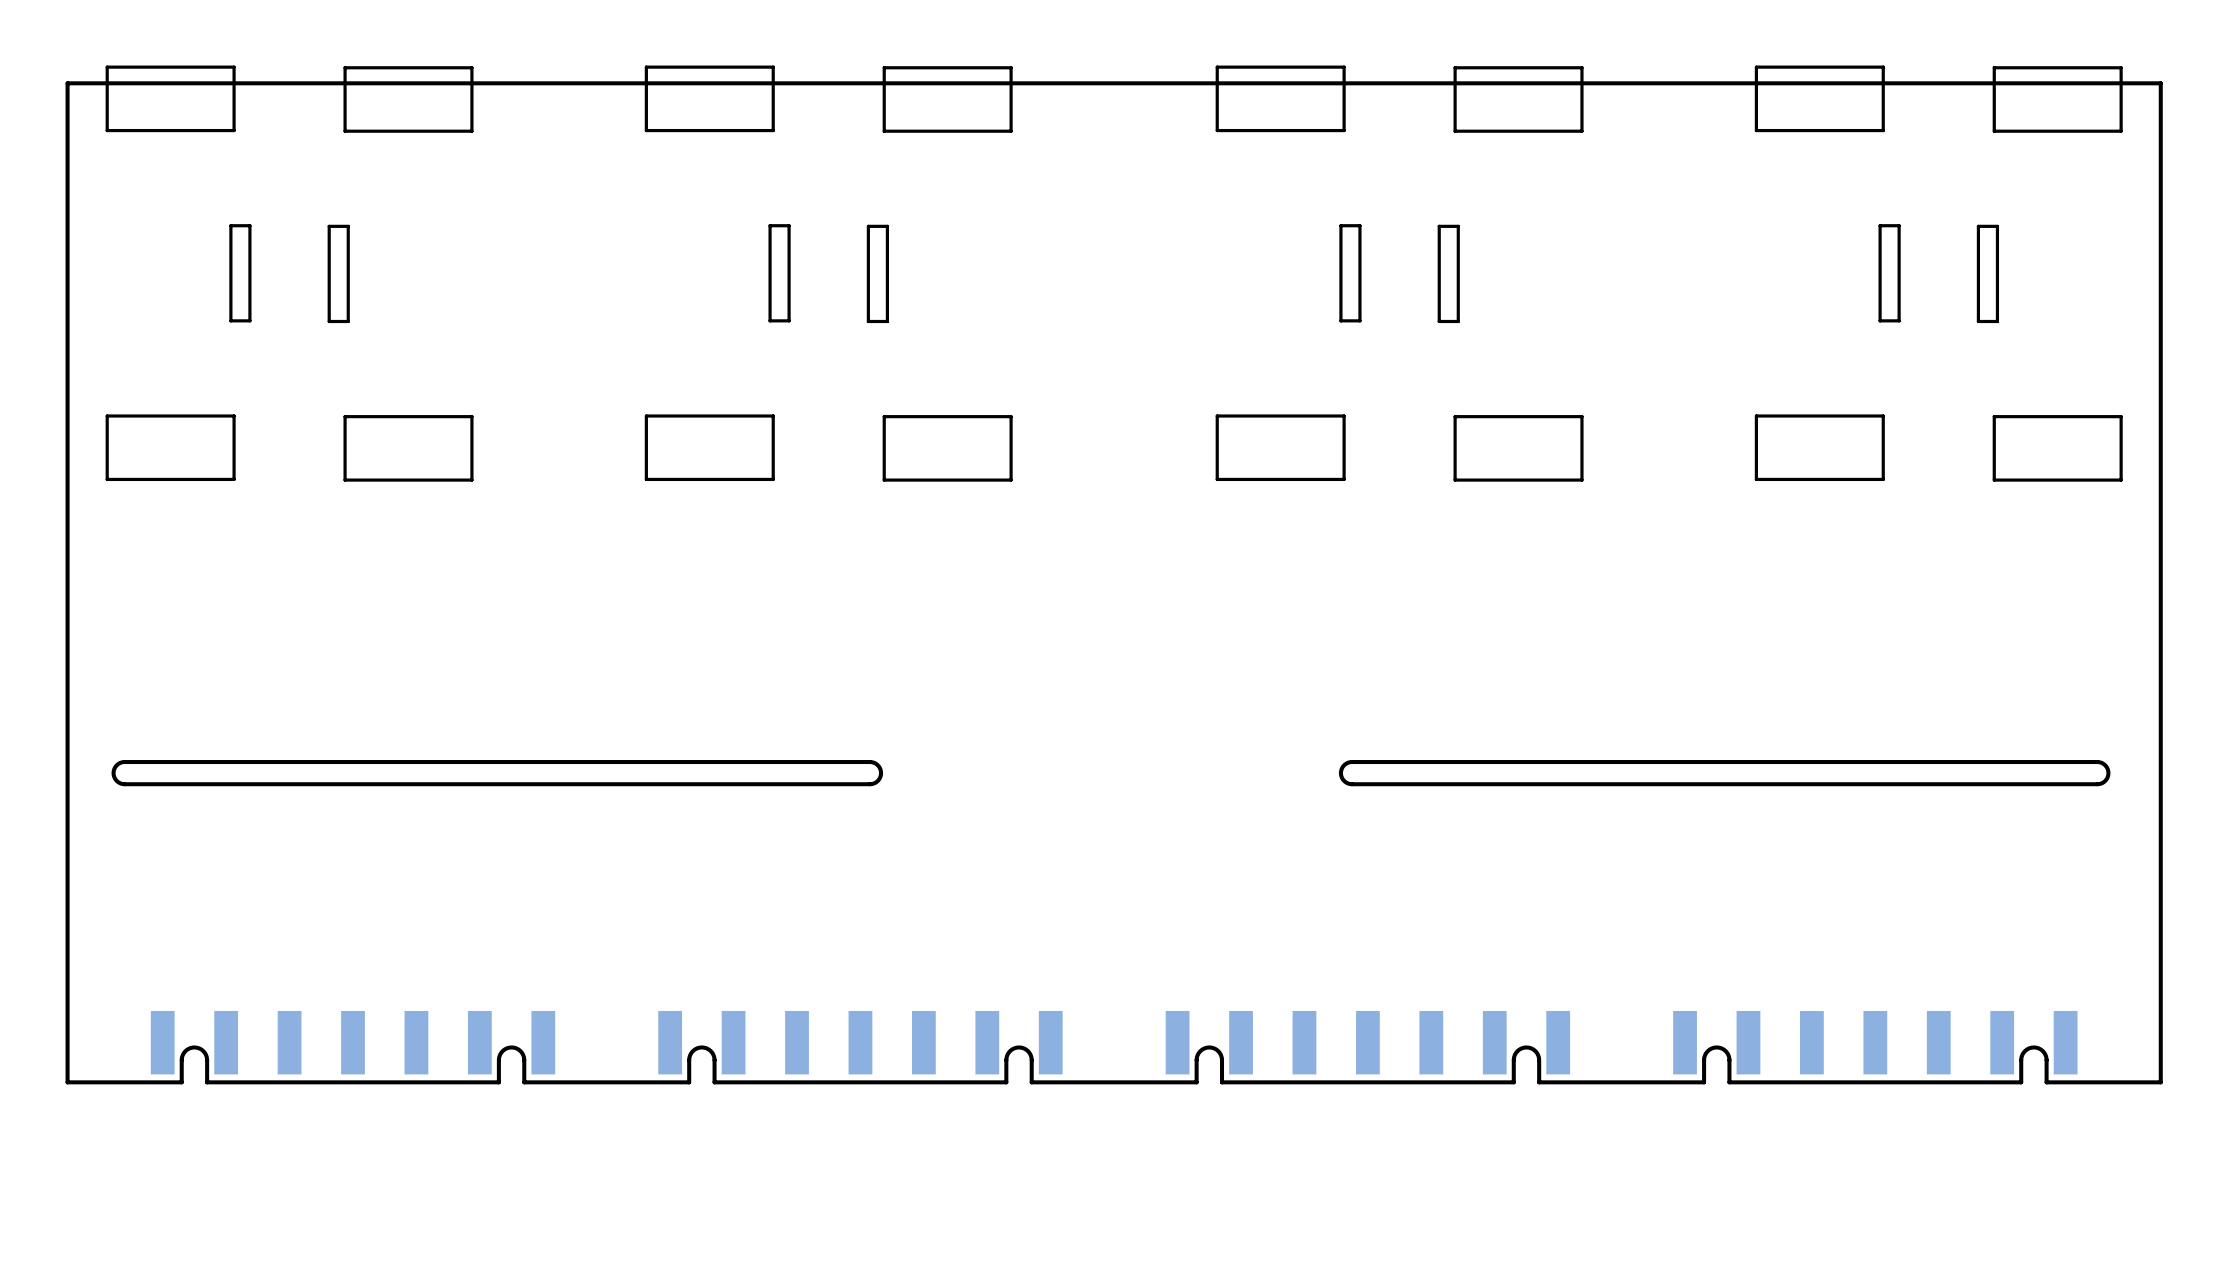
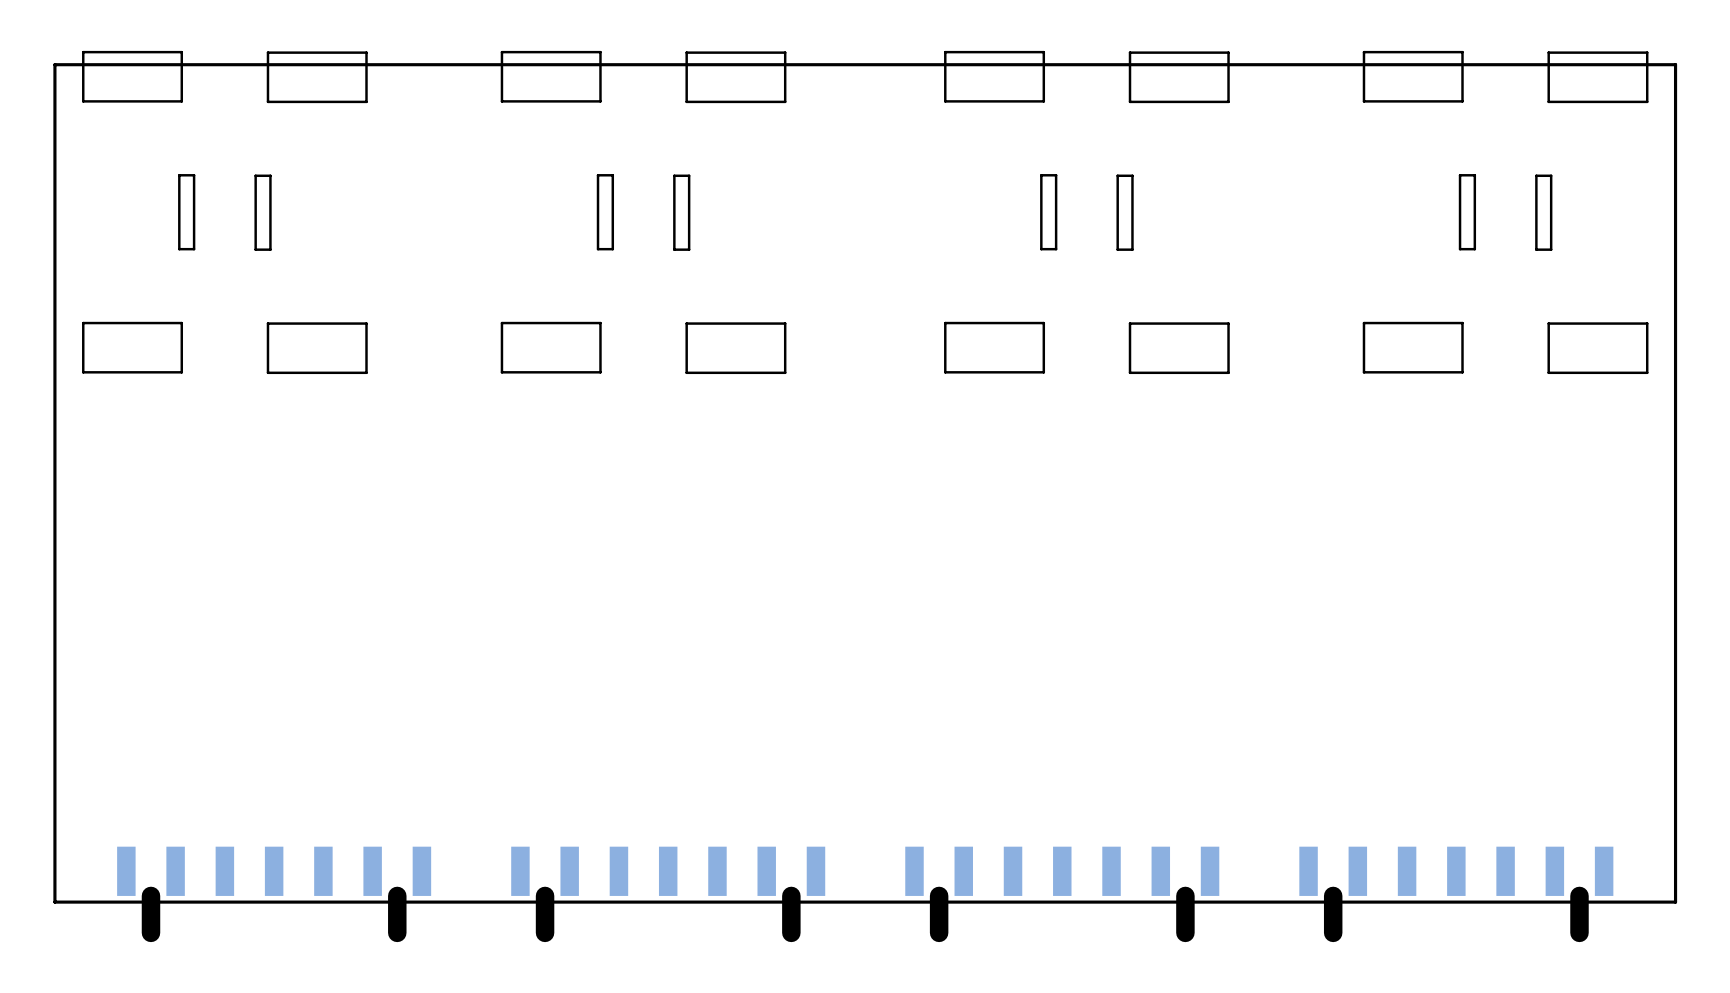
board edge: (2157, 83) (2160, 83) (2160, 1082) (2046, 1082) (2045, 1055) (2040, 1049) (2033, 1047) (2027, 1049) (2022, 1055) (2021, 1082) (1729, 1082) (1728, 1055) (1723, 1049) (1716, 1047) (1710, 1049) (1705, 1055) (1704, 1082) (1539, 1082) (1538, 1055) (1532, 1049) (1526, 1047) (1520, 1049) (1514, 1055) (1513, 1082) (1222, 1082) (1221, 1055) (1215, 1049) (1209, 1047) (1202, 1049) (1197, 1055) (1196, 1082) (1031, 1082) (1030, 1055) (1025, 1049) (1019, 1047) (1012, 1049) (1007, 1055) (1006, 1082) (714, 1082) (713, 1055) (708, 1049) (701, 1047) (695, 1049) (690, 1055) (689, 1082) (524, 1082) (523, 1055) (517, 1049) (511, 1047) (505, 1049) (499, 1055) (498, 1082) (207, 1082) (206, 1055) (200, 1049) (194, 1047) (188, 1049) (182, 1055) (181, 1082) (67, 1082) (67, 83) (70, 83) -> (1675, 64) (1675, 902) (54, 902) (54, 64)
board edge: (869, 762) (124, 762) (116, 765) (113, 773) (116, 780) (124, 784) (869, 784) (877, 780) (881, 773) (877, 765) (869, 762) -> none
board edge: (2097, 762) (1352, 762) (1344, 765) (1340, 773) (1344, 780) (1352, 784) (2097, 784) (2105, 780) (2108, 773) (2105, 765) (2097, 762) -> none
part position: (353, 1042) -> (274, 871)
part position: (860, 1042) -> (668, 871)
part position: (1367, 1042) -> (1062, 871)
part position: (1875, 1042) -> (1456, 871)
board edge: none -> (150, 895) (150, 932)
board edge: none -> (397, 895) (397, 932)
board edge: none -> (545, 895) (545, 932)
board edge: none -> (791, 895) (791, 932)
board edge: none -> (939, 895) (939, 932)
board edge: none -> (1185, 895) (1185, 932)
board edge: none -> (1333, 895) (1333, 932)
board edge: none -> (1579, 895) (1579, 932)

